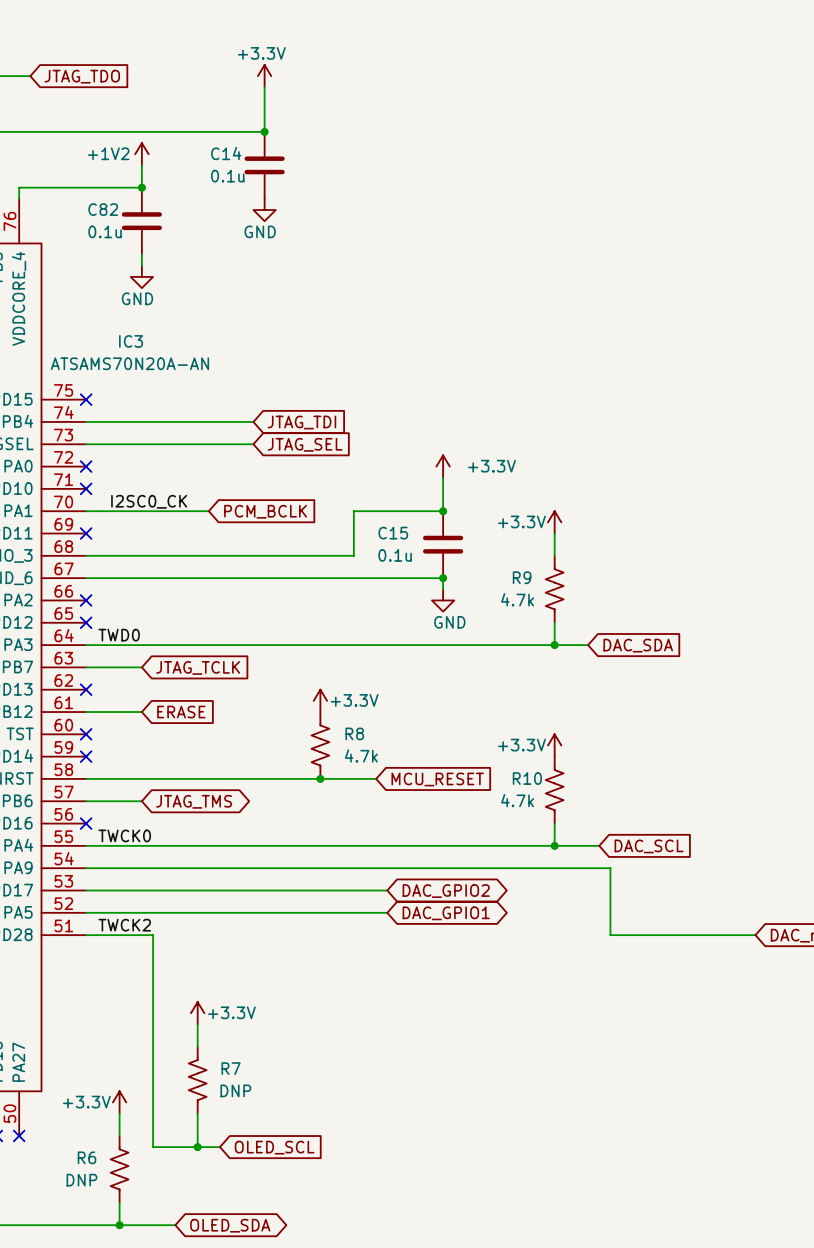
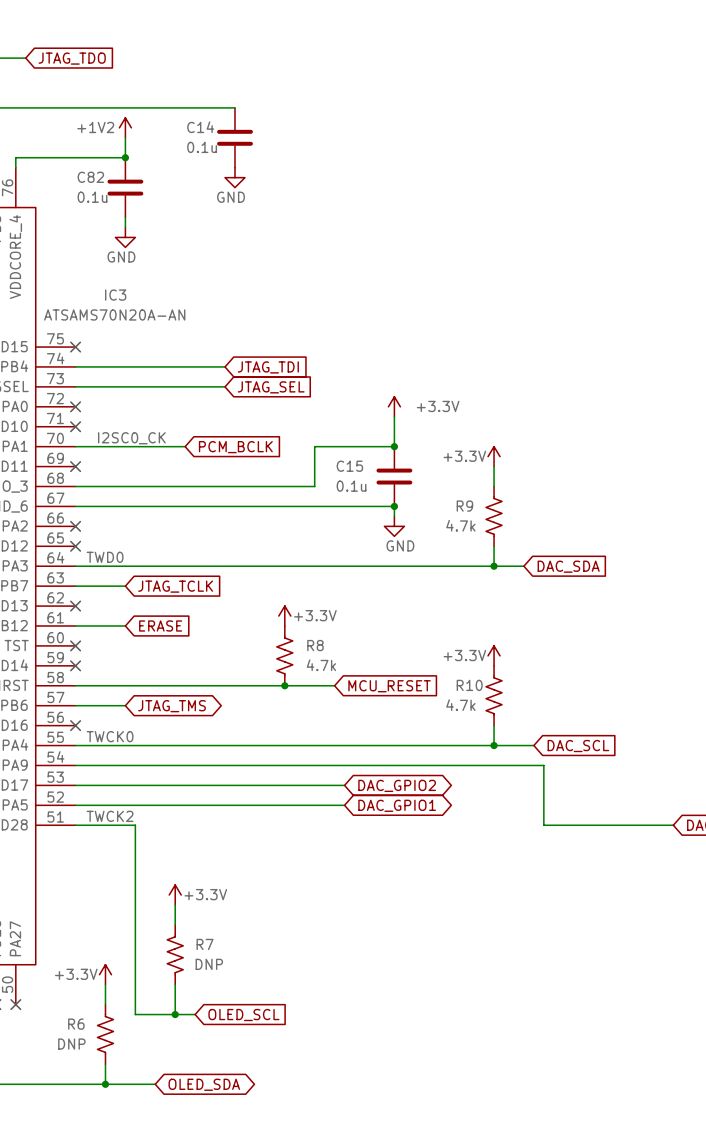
power symbol: +3.3V (264, 76) -> none
wire: (264, 87) (264, 131) -> none
junction: (264, 131) -> none

